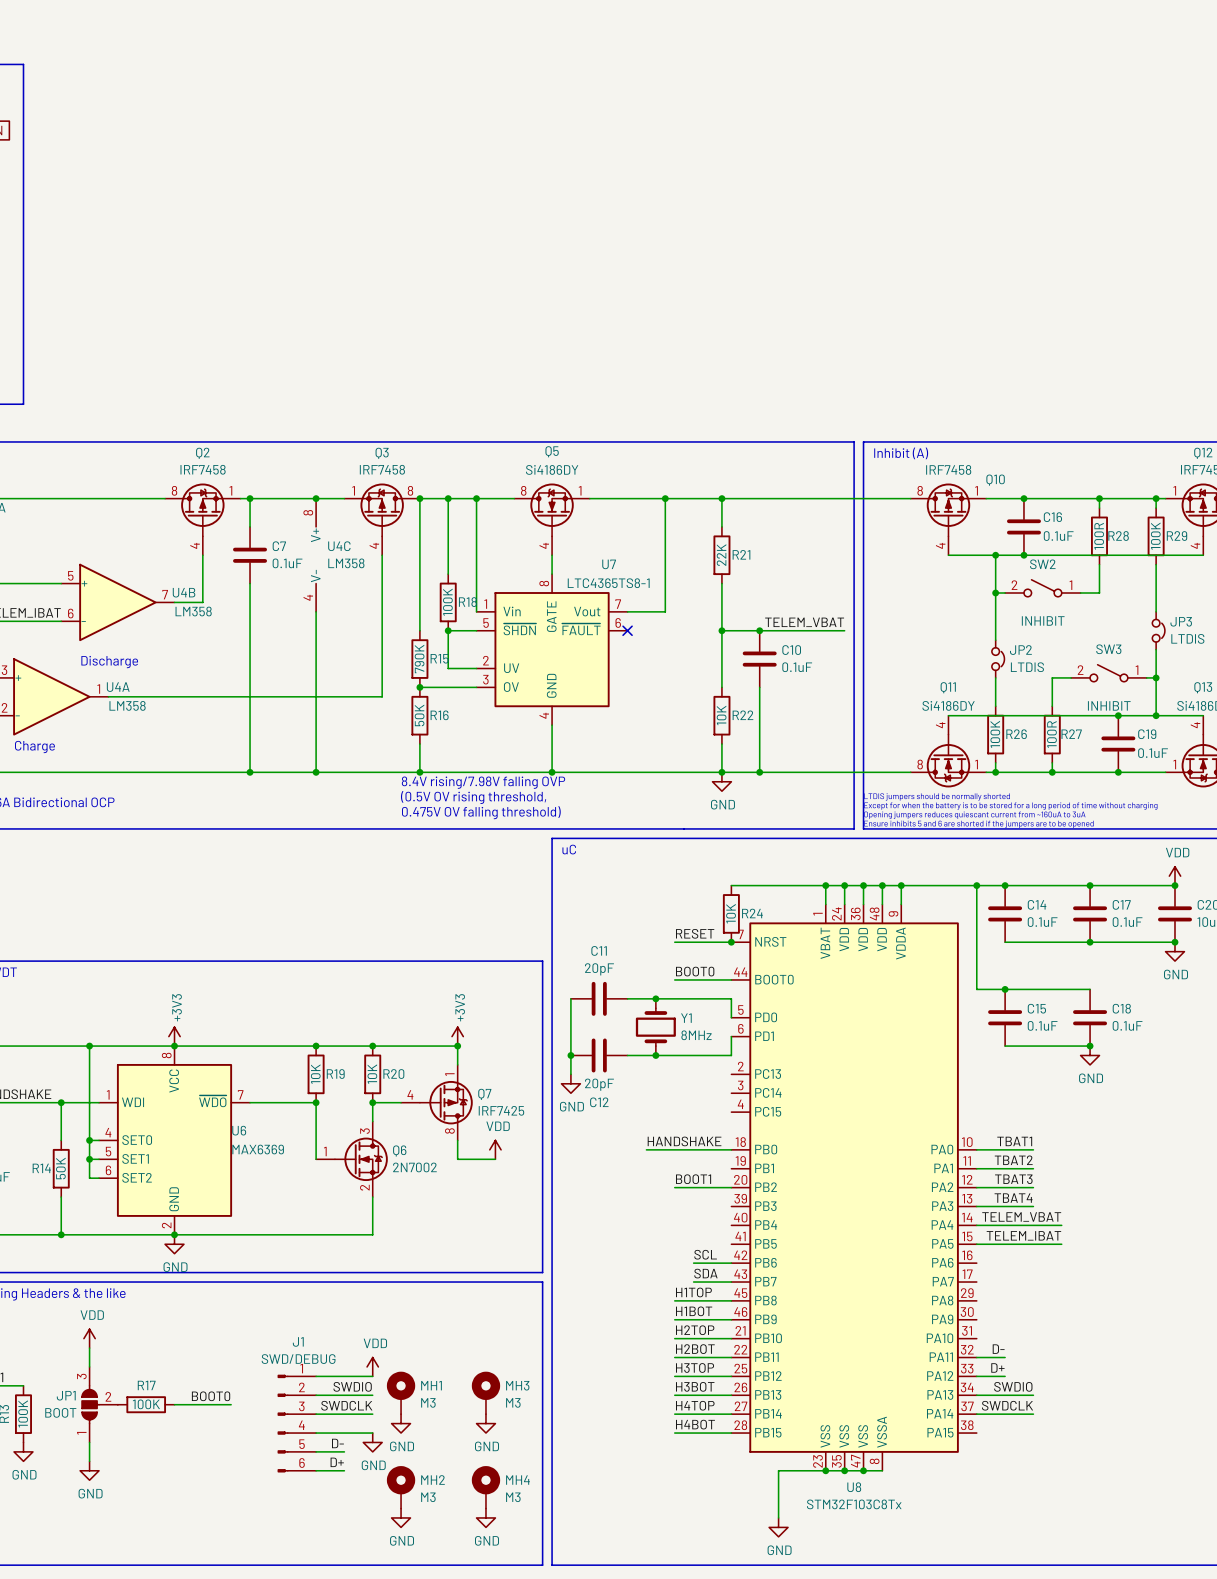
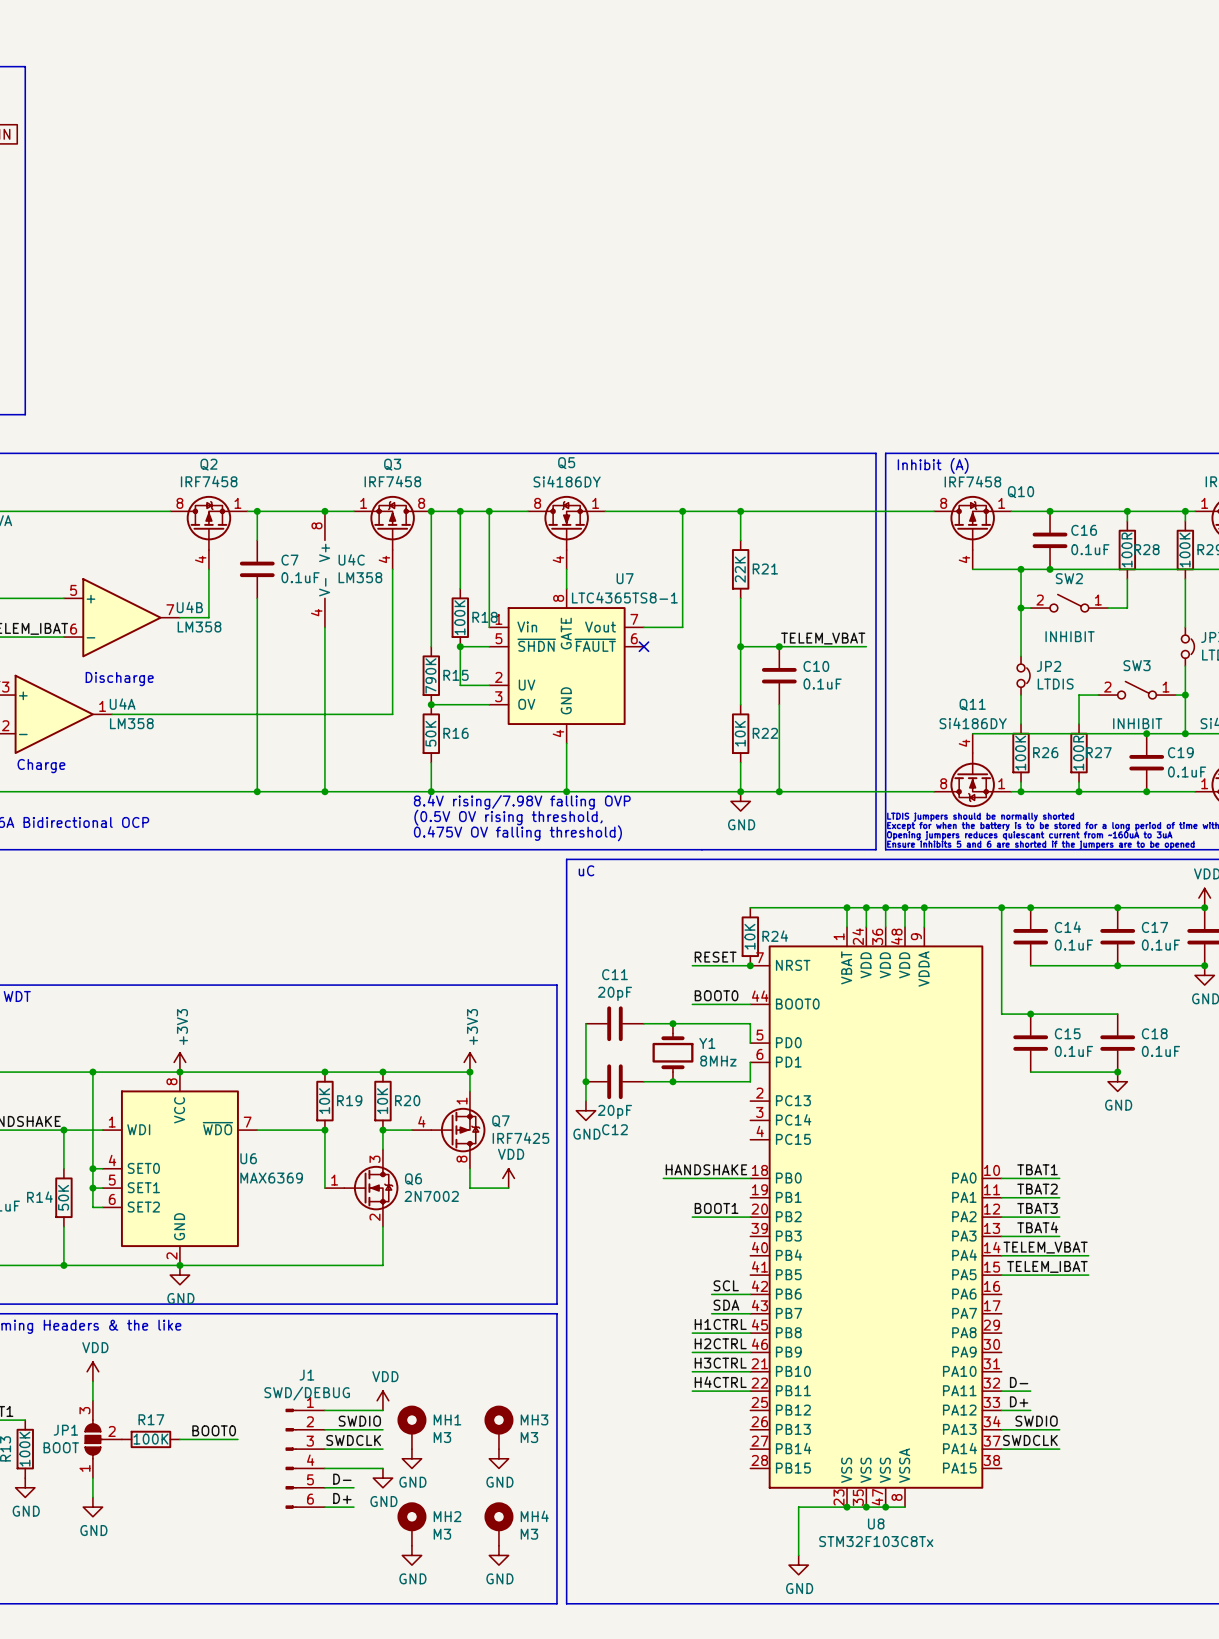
label: H1TOP (693, 1292) -> H1CTRL (720, 1324)
label: H1BOT (694, 1311) -> H2CTRL (720, 1343)
label: H2TOP (695, 1330) -> H3CTRL (720, 1363)
label: H2BOT (695, 1349) -> H4CTRL (720, 1382)
label: H3TOP (695, 1367) -> none
wire: (674, 1376) (731, 1376) -> none
label: H3BOT (695, 1386) -> none
wire: (674, 1395) (731, 1395) -> none
label: H4TOP (695, 1405) -> none
wire: (674, 1414) (731, 1414) -> none
label: H4BOT (695, 1424) -> none
wire: (674, 1433) (731, 1433) -> none

